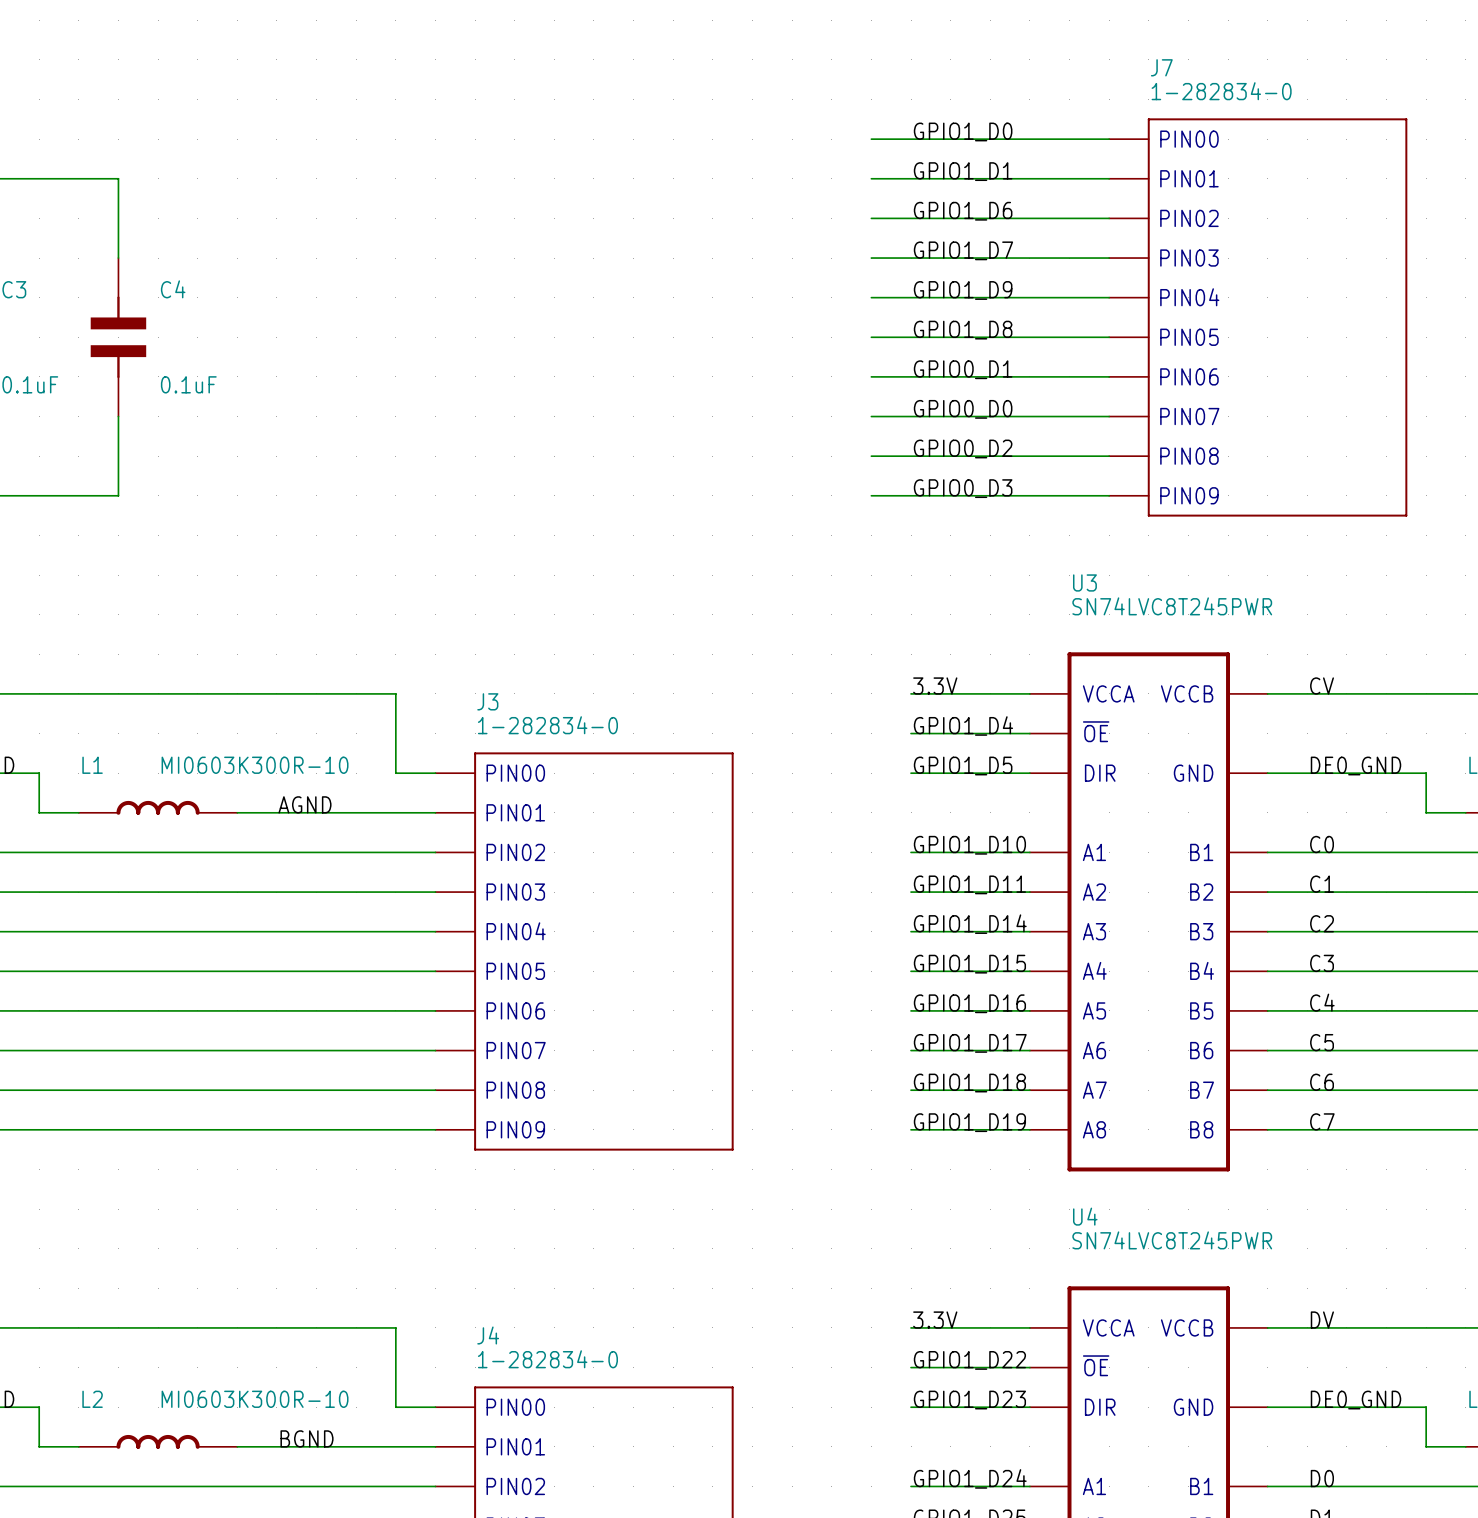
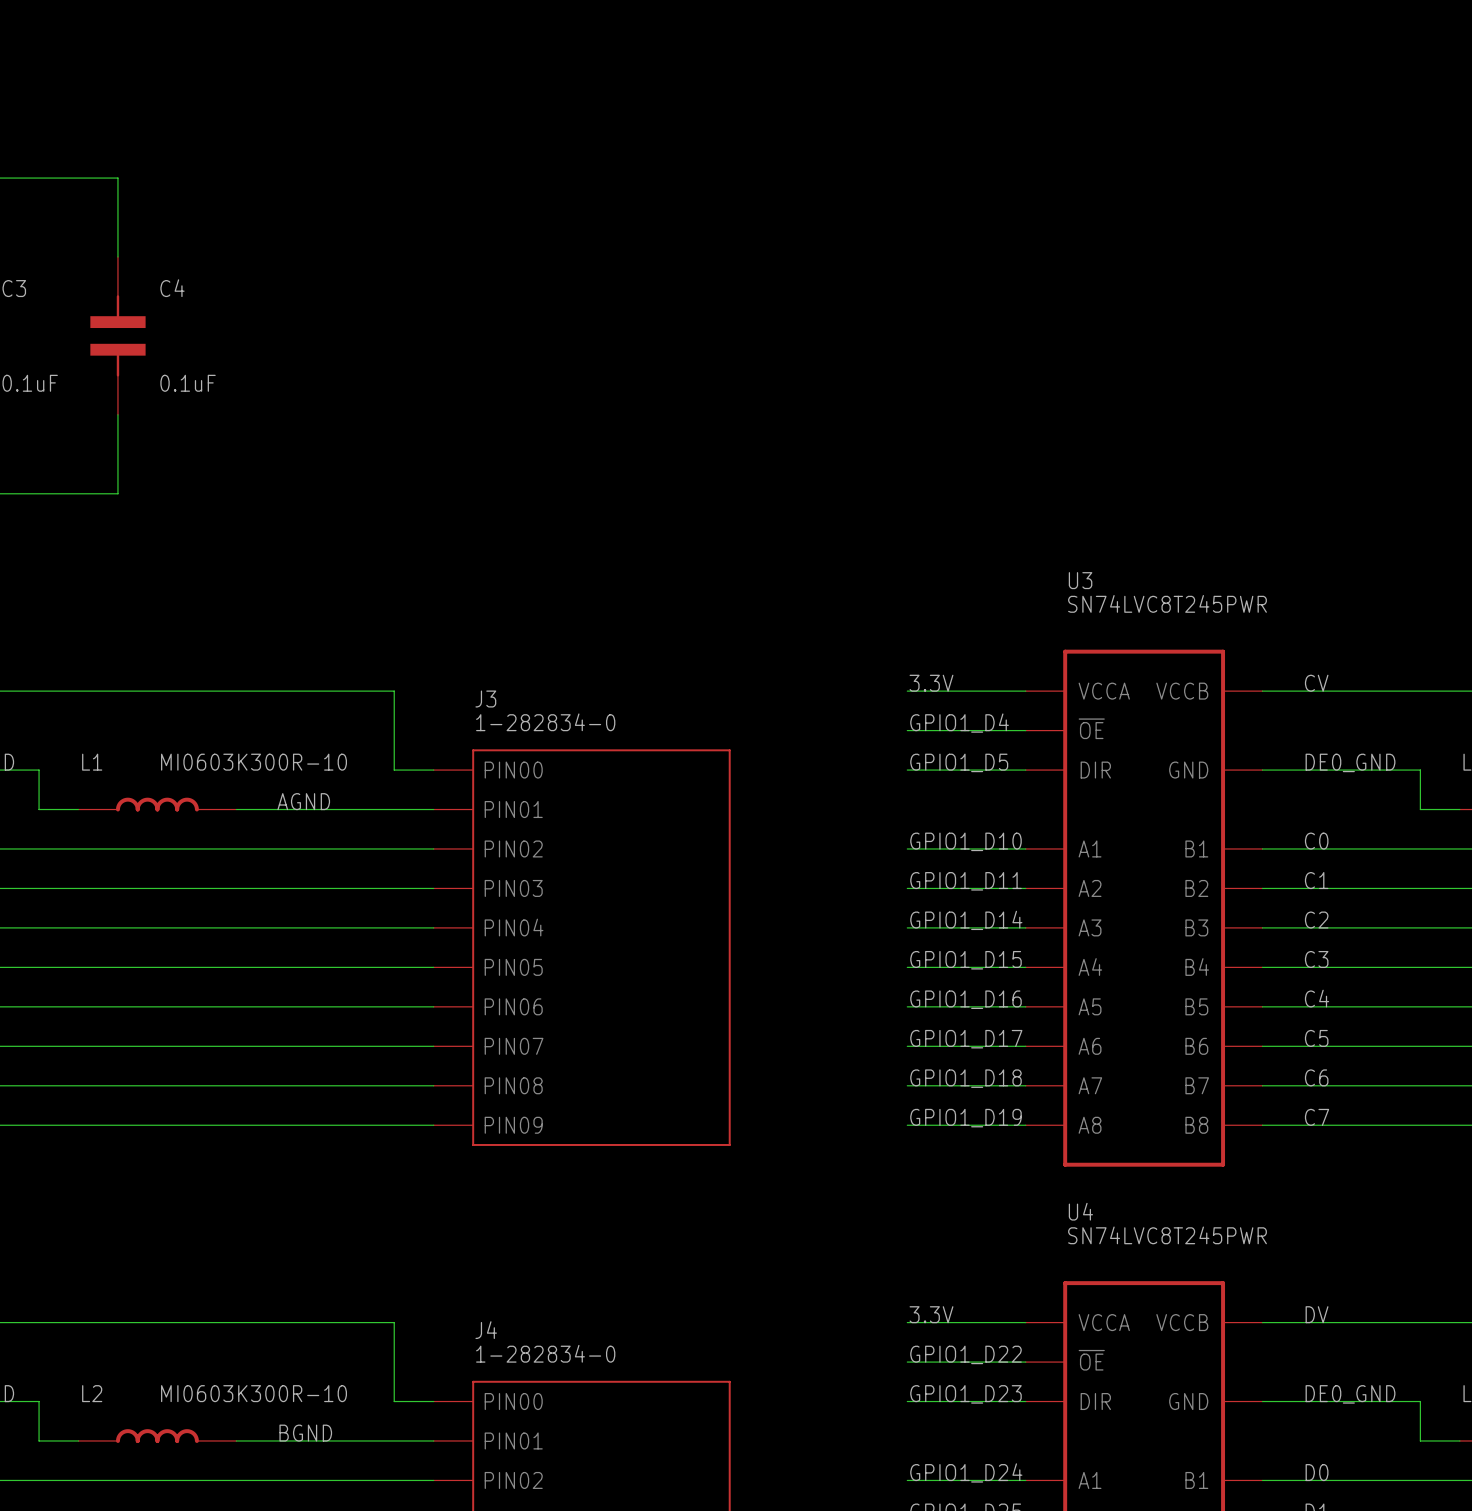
label: GPIO1_D0 (963, 131) -> none
wire: (871, 139) (1109, 139) -> none
label: GPIO1_D1 (963, 171) -> none
wire: (871, 178) (1109, 178) -> none
label: GPIO1_D6 (963, 211) -> none
wire: (871, 218) (1109, 218) -> none
label: GPIO1_D7 (963, 250) -> none
wire: (871, 258) (1109, 258) -> none
label: GPIO1_D9 (963, 290) -> none
wire: (871, 297) (1109, 297) -> none
J7: 1-282834-0 (1258, 317) -> none
label: GPIO1_D8 (963, 330) -> none
wire: (871, 337) (1109, 337) -> none
label: GPIO0_D1 (963, 369) -> none
wire: (871, 376) (1109, 376) -> none
label: GPIO0_D0 (963, 409) -> none
wire: (871, 416) (1109, 416) -> none
label: GPIO0_D2 (963, 448) -> none
wire: (871, 456) (1109, 456) -> none
label: GPIO0_D3 (963, 488) -> none
wire: (871, 495) (1109, 495) -> none

